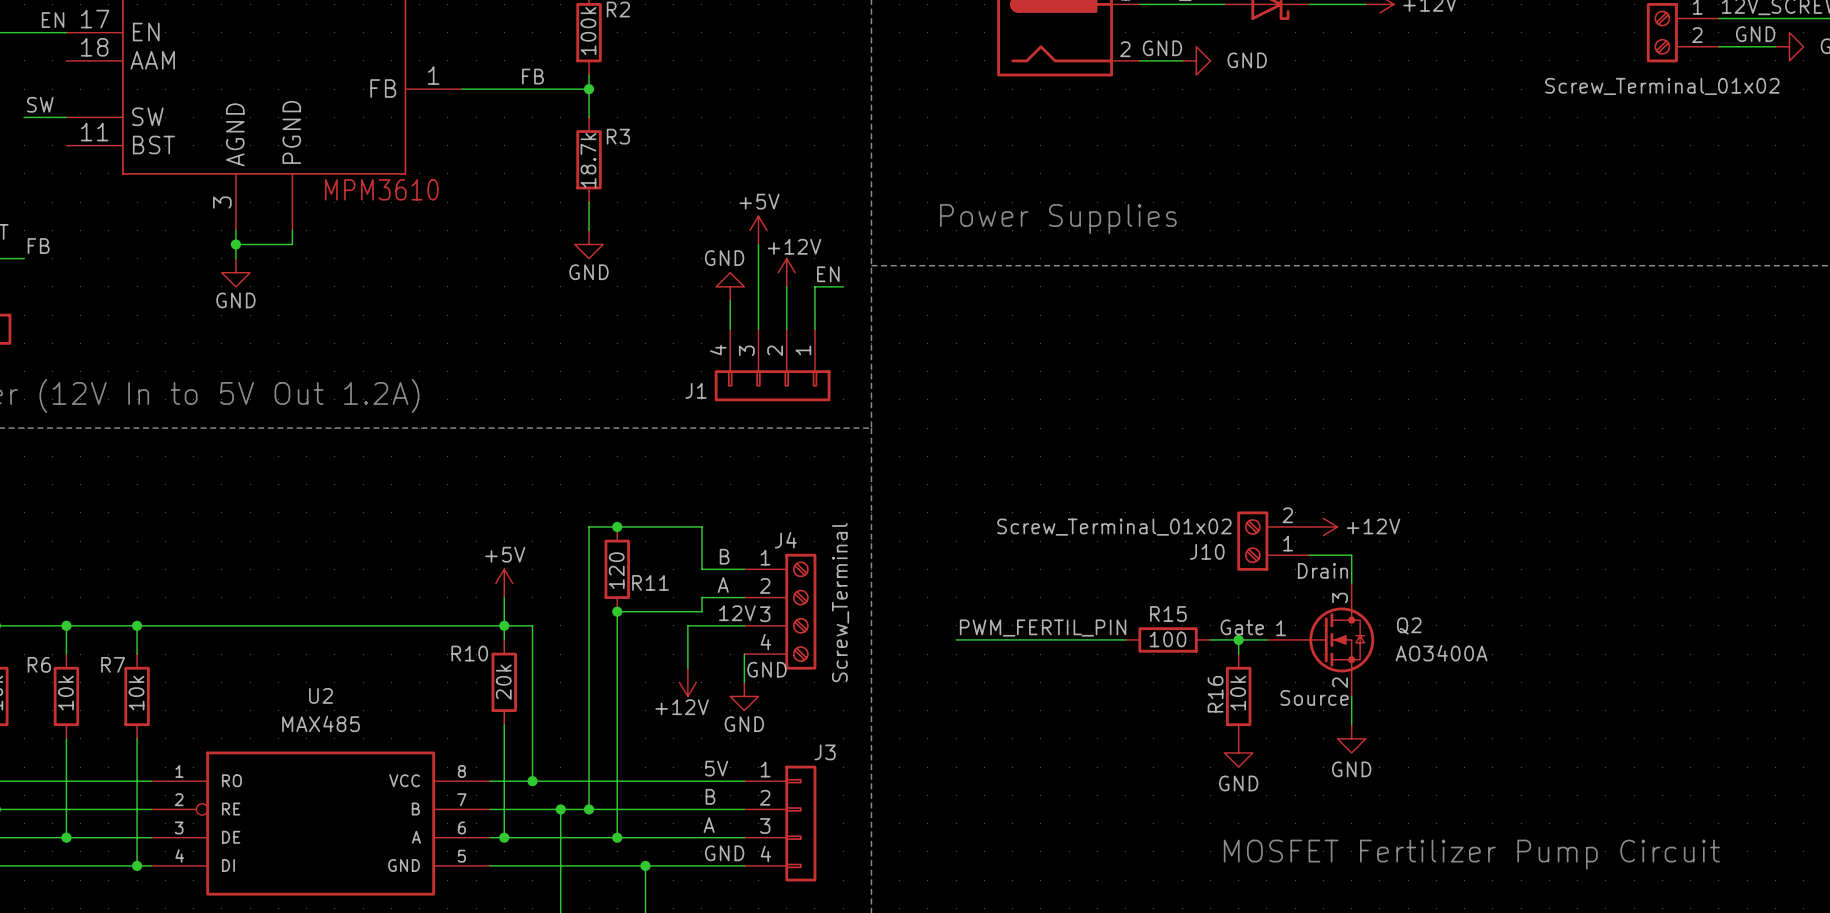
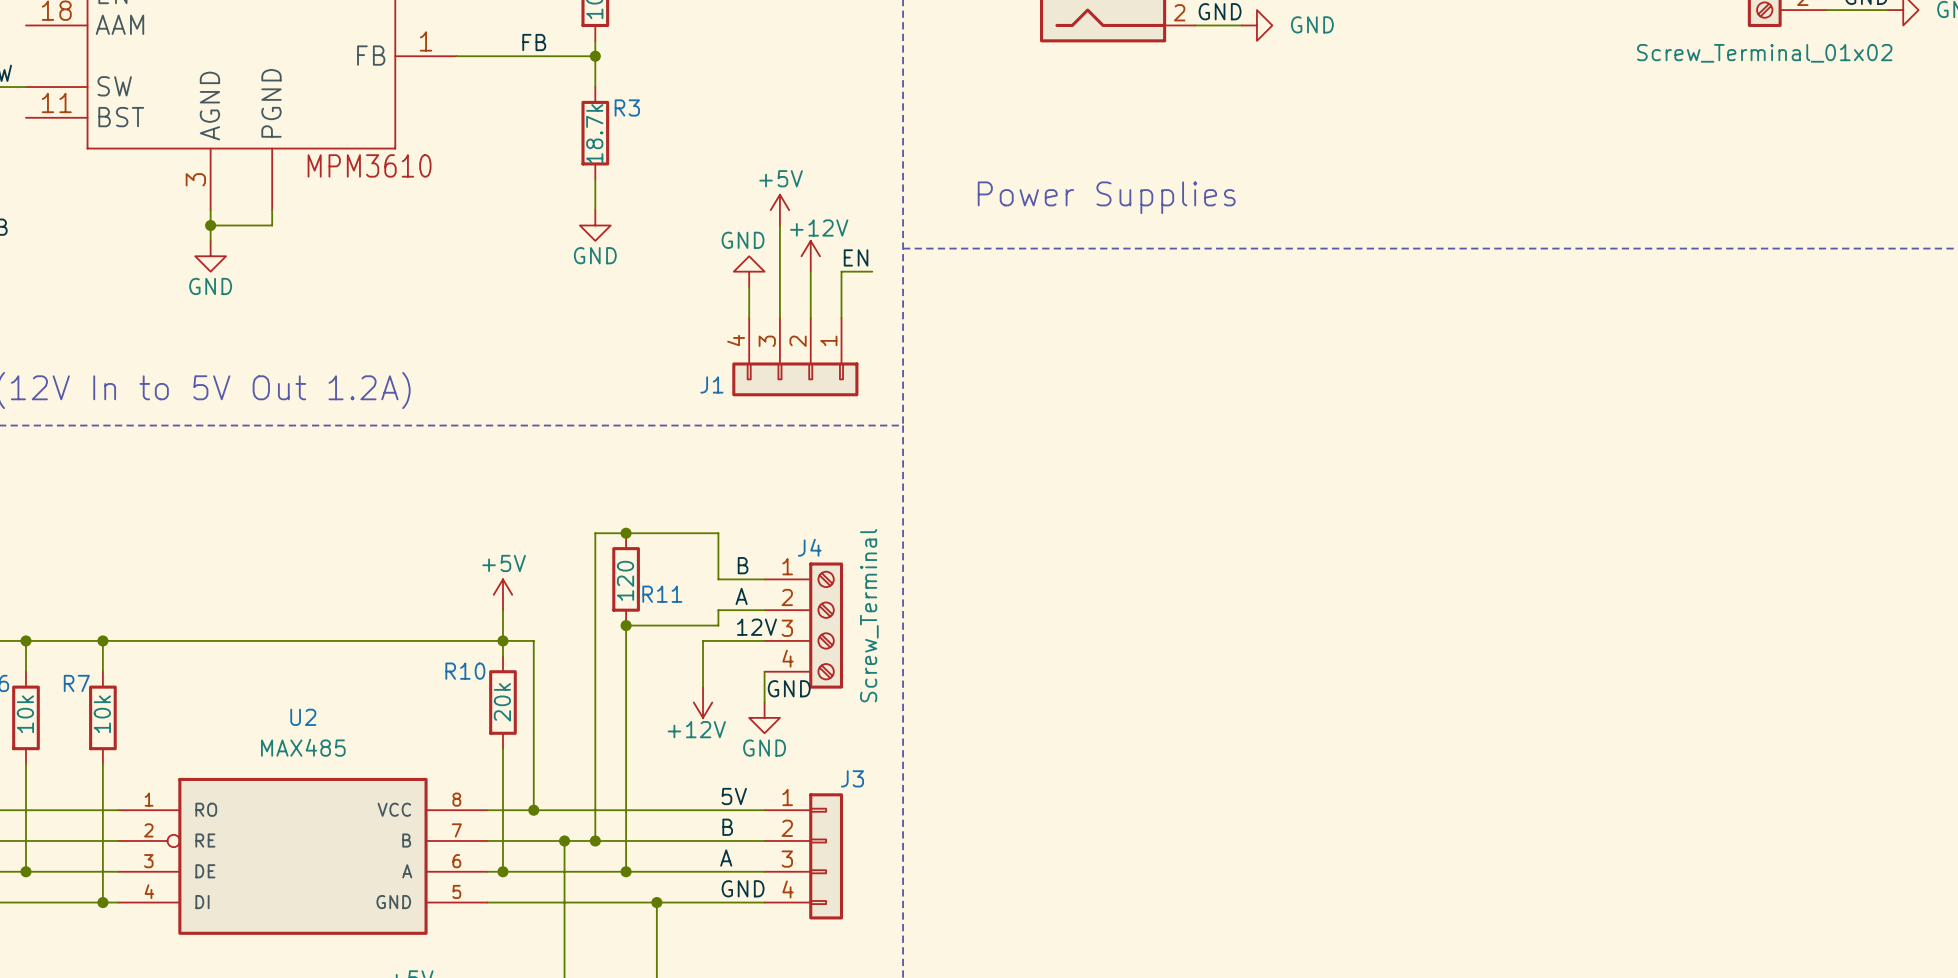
power symbol: +12V (1323, 526) -> none
J10: Screw_Terminal_01x02 (1273, 541) -> none
wire: (1309, 555) (1351, 555) (1351, 583) -> none
label: Drain (1322, 570) -> none
label: Gate (1242, 627) -> none
label: PWM_FERTIL_PIN (1043, 628) -> none
wire: (956, 639) (1125, 639) -> none
R15: 100 (1168, 639) -> none
wire: (1210, 639) (1266, 639) -> none
wire: (1238, 639) (1238, 654) -> none
junction: (1238, 639) -> none
Q2: AO3400A (1320, 639) -> none
R16: 10k (1238, 696) -> none
wire: (1351, 696) (1351, 724) -> none
label: Source (1314, 697) -> none
power symbol: GND (1351, 738) -> none
power symbol: GND (1238, 752) -> none
text: MOSFET Fertilizer Pump Circuit (1471, 854) -> none

